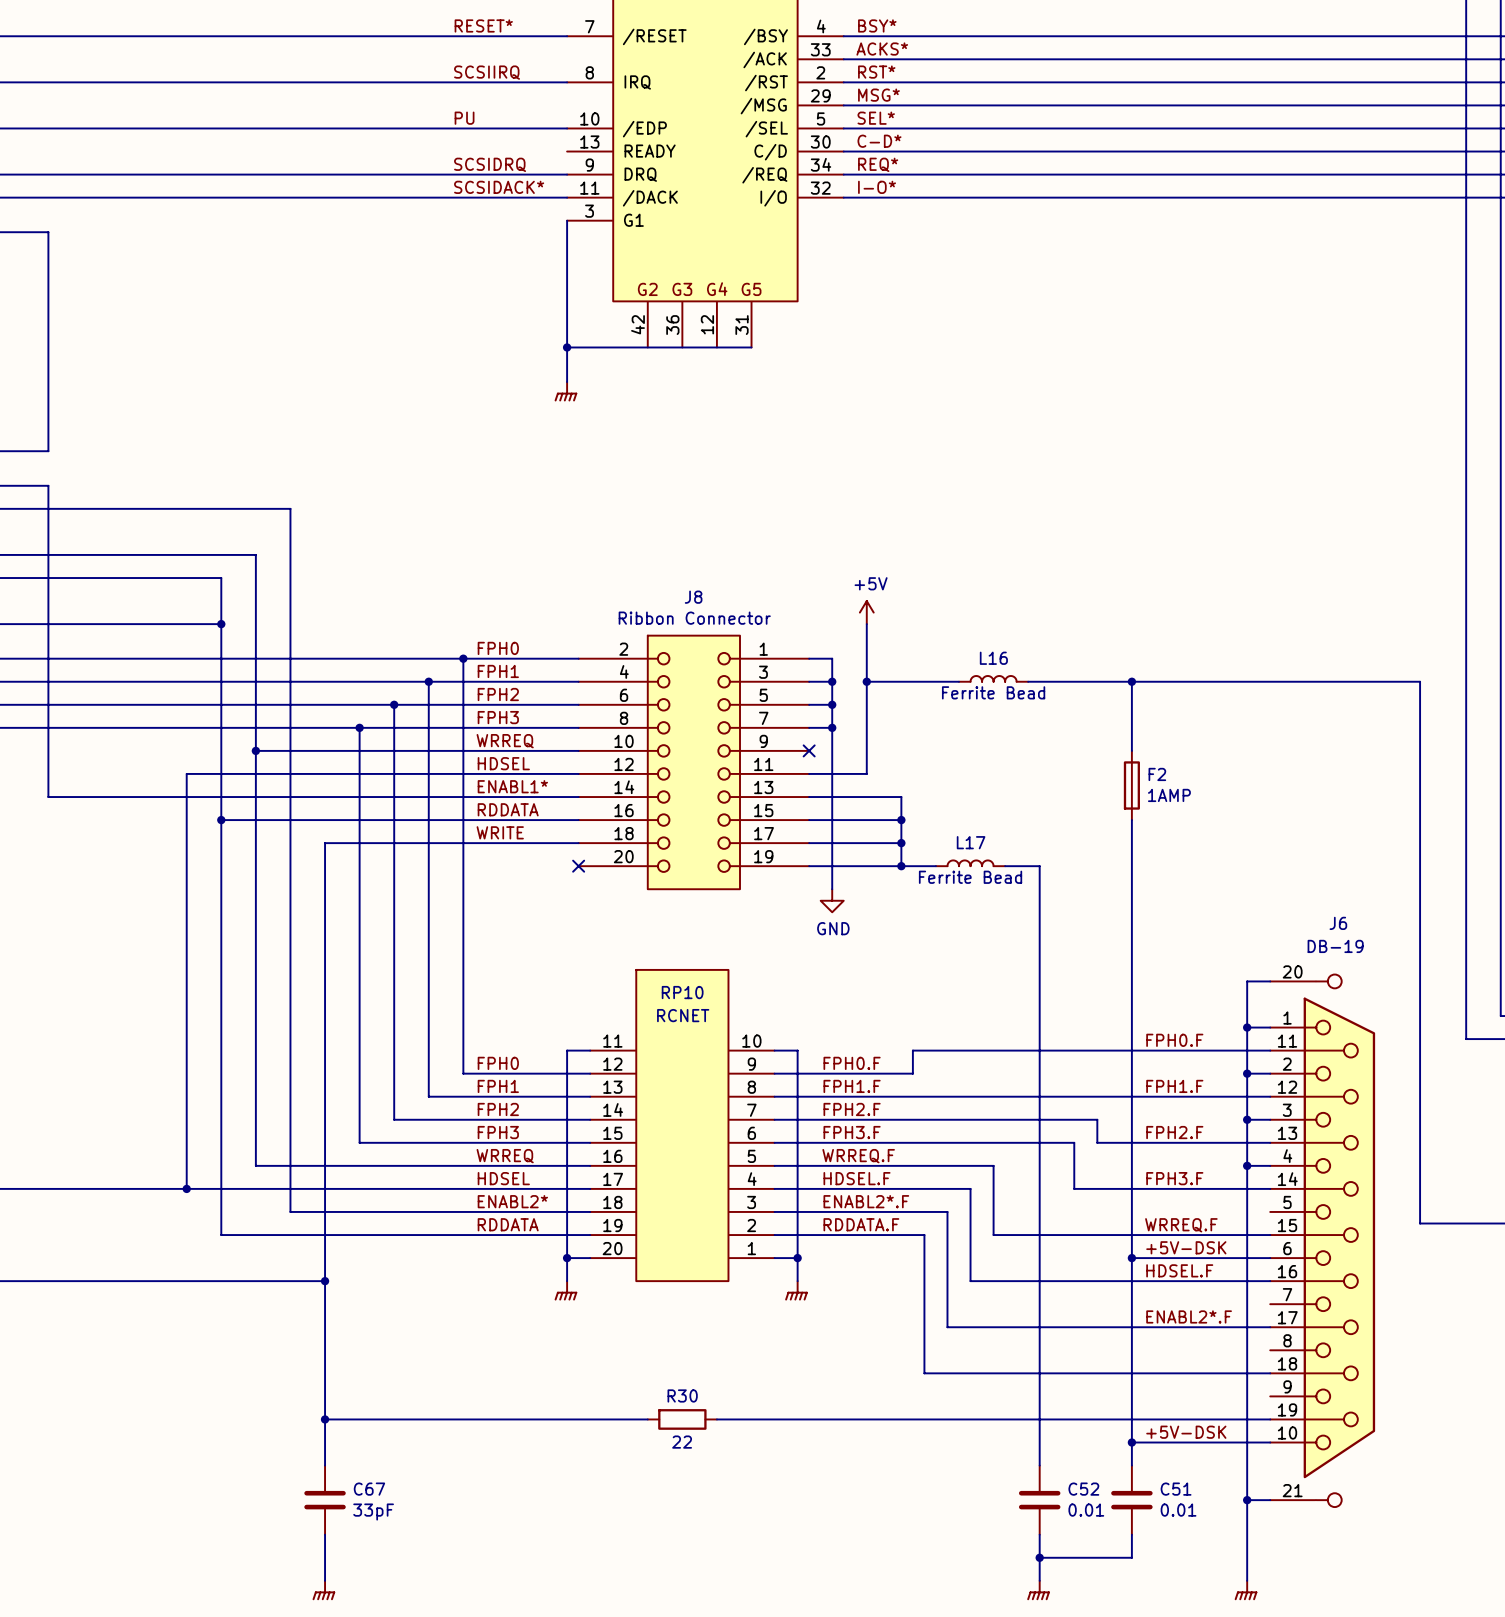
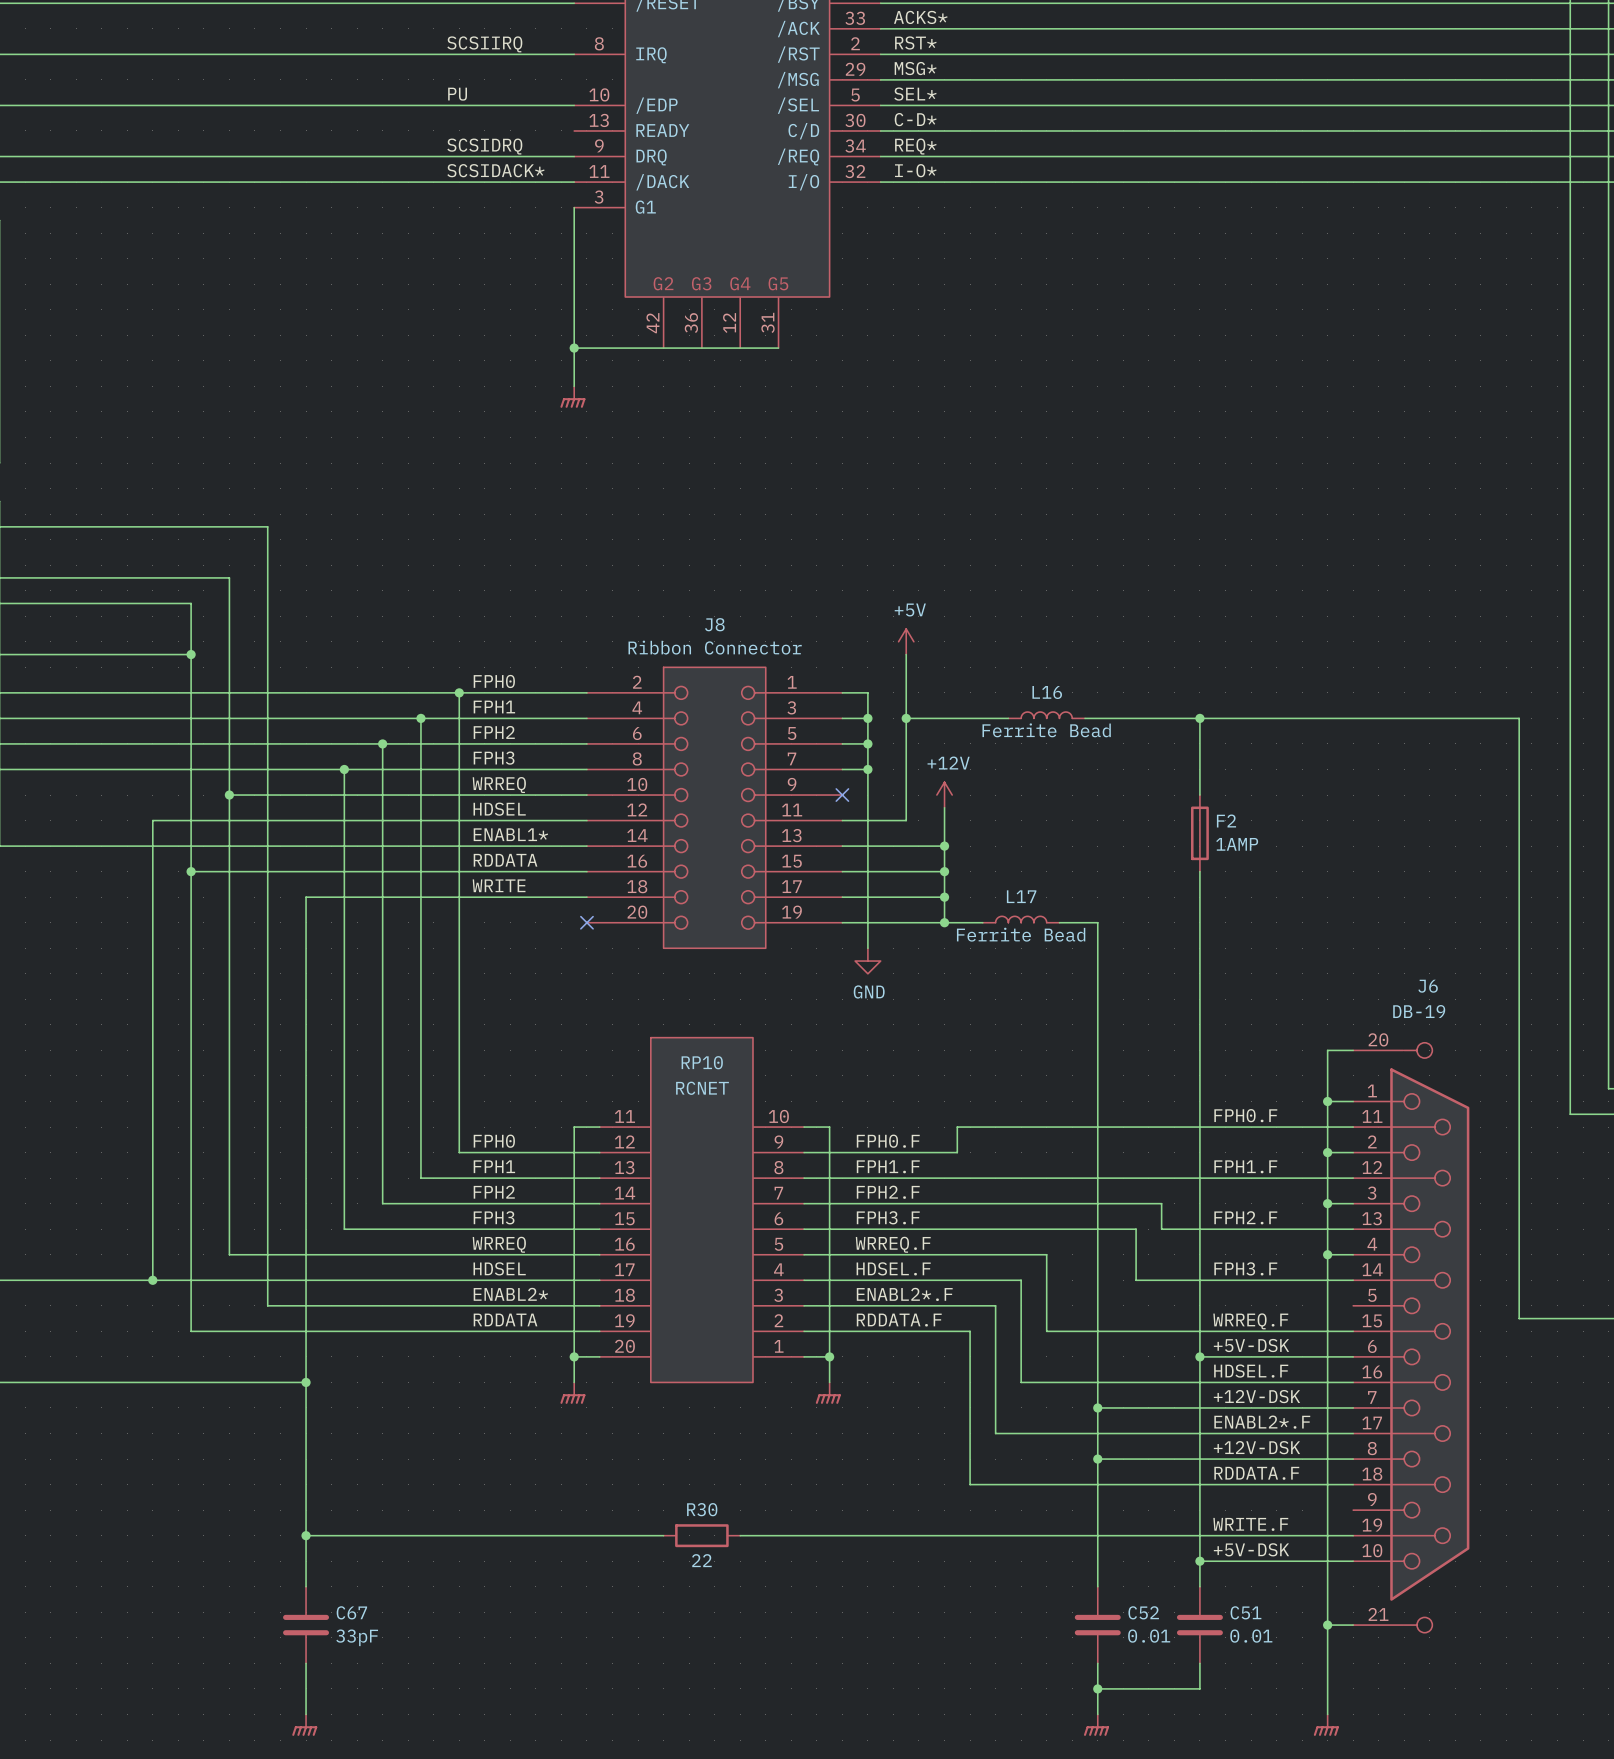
power symbol: none -> +12V (944, 795)
wire: none -> (944, 807) (944, 846)
junction: none -> (944, 846)
label: none -> +12V-DSK (1256, 1396)
wire: none -> (1097, 1407) (1353, 1407)
junction: none -> (1097, 1407)
label: none -> +12V-DSK (1256, 1447)
wire: none -> (1097, 1459) (1353, 1459)
junction: none -> (1097, 1459)
label: none -> RDDATA.F (1256, 1473)
label: none -> WRITE.F (1250, 1524)

